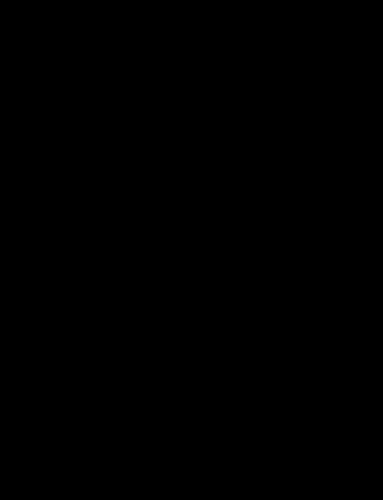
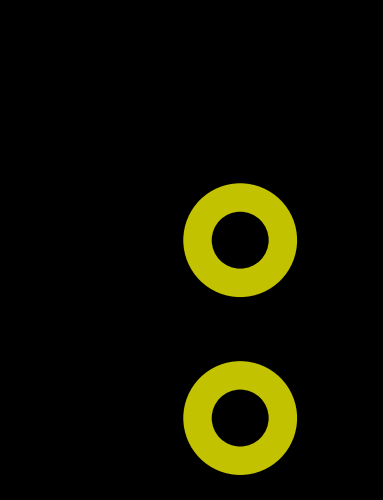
part: none -> (240, 329)

